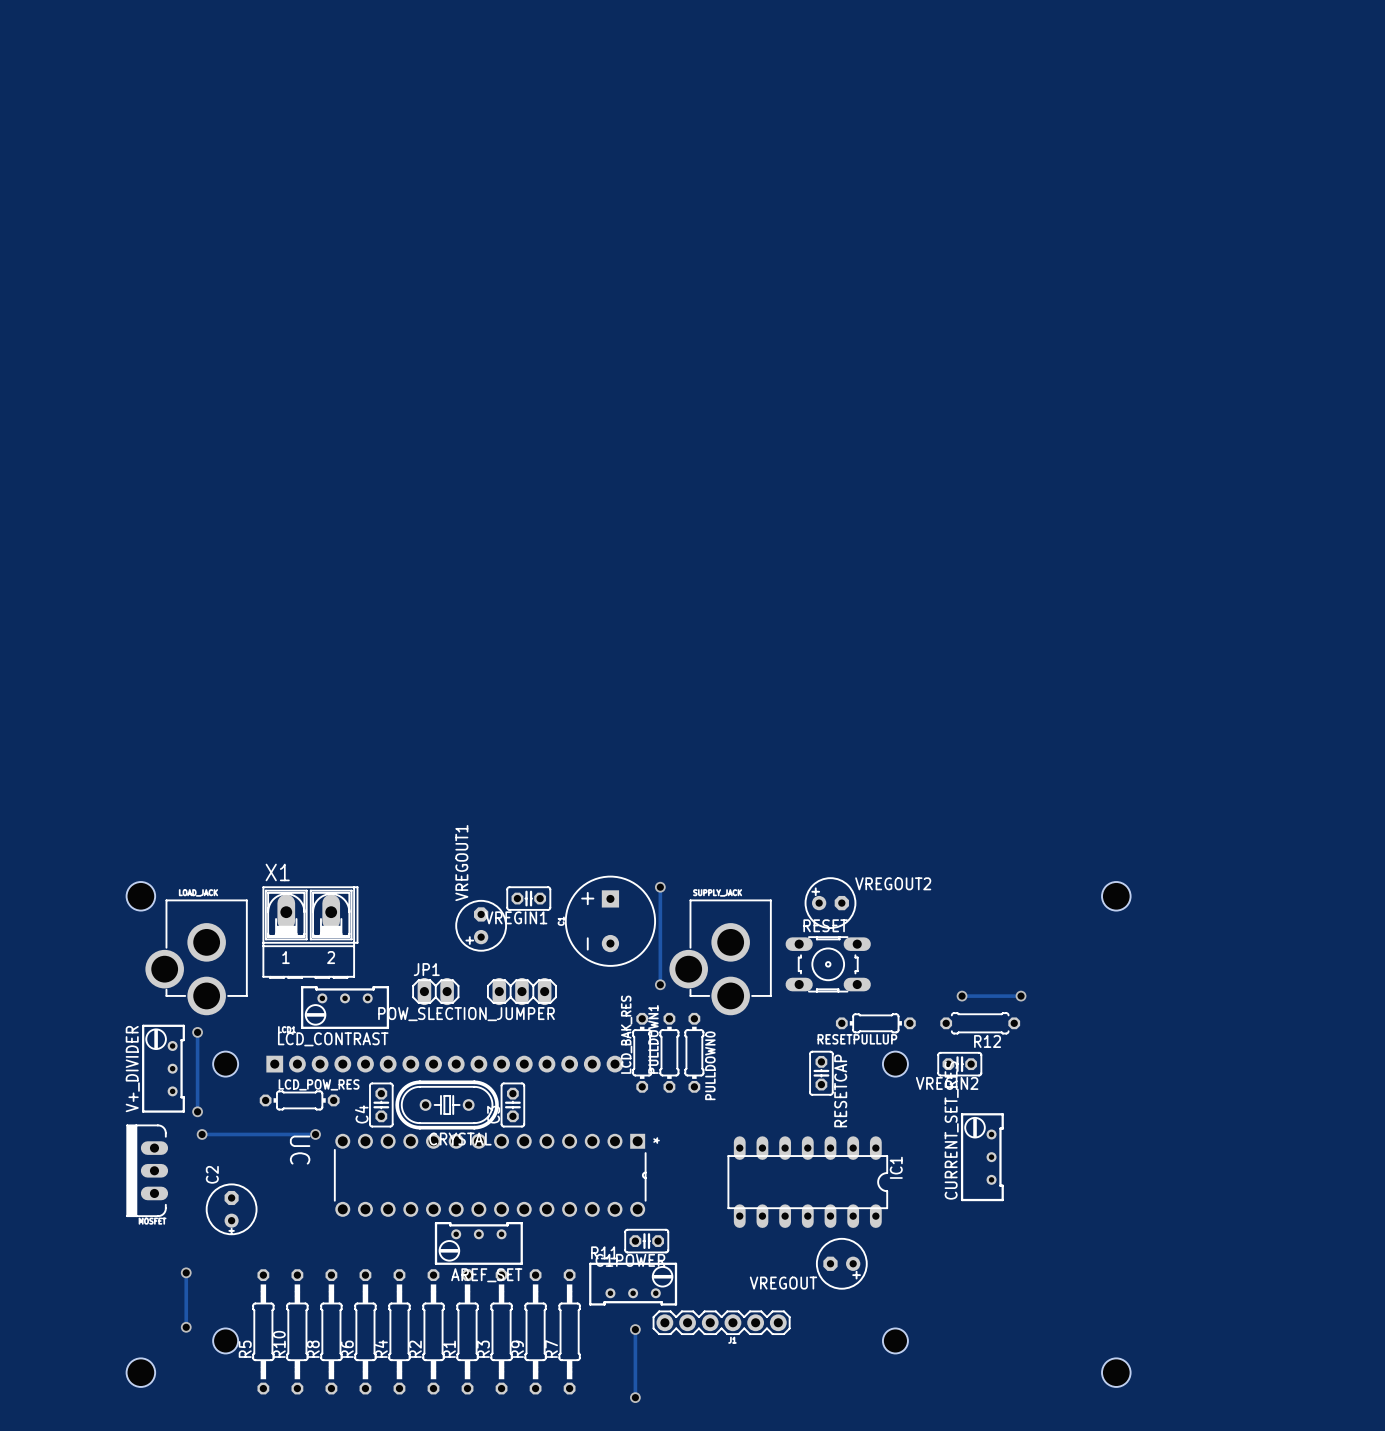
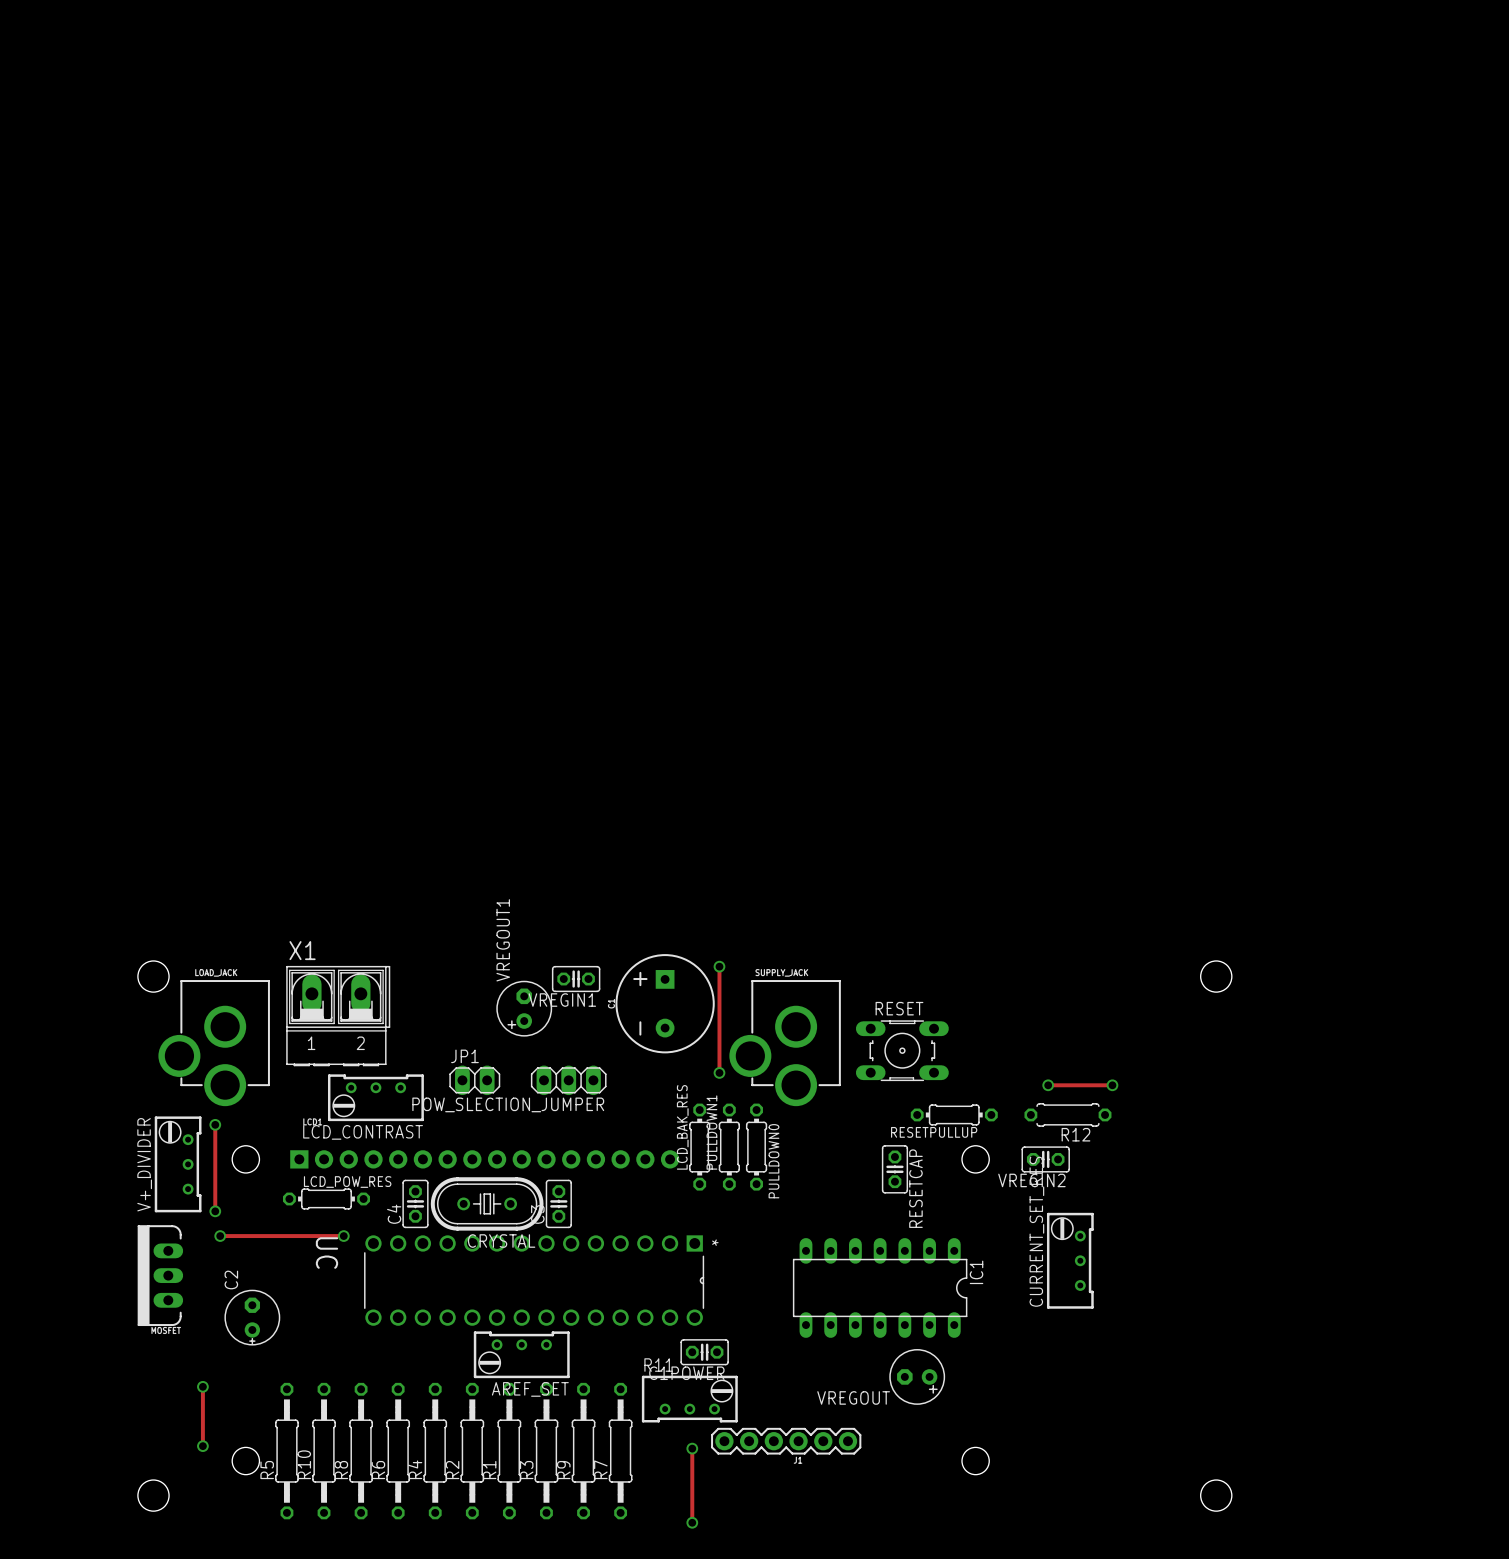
VREGOUT2: (830, 903) -> none

